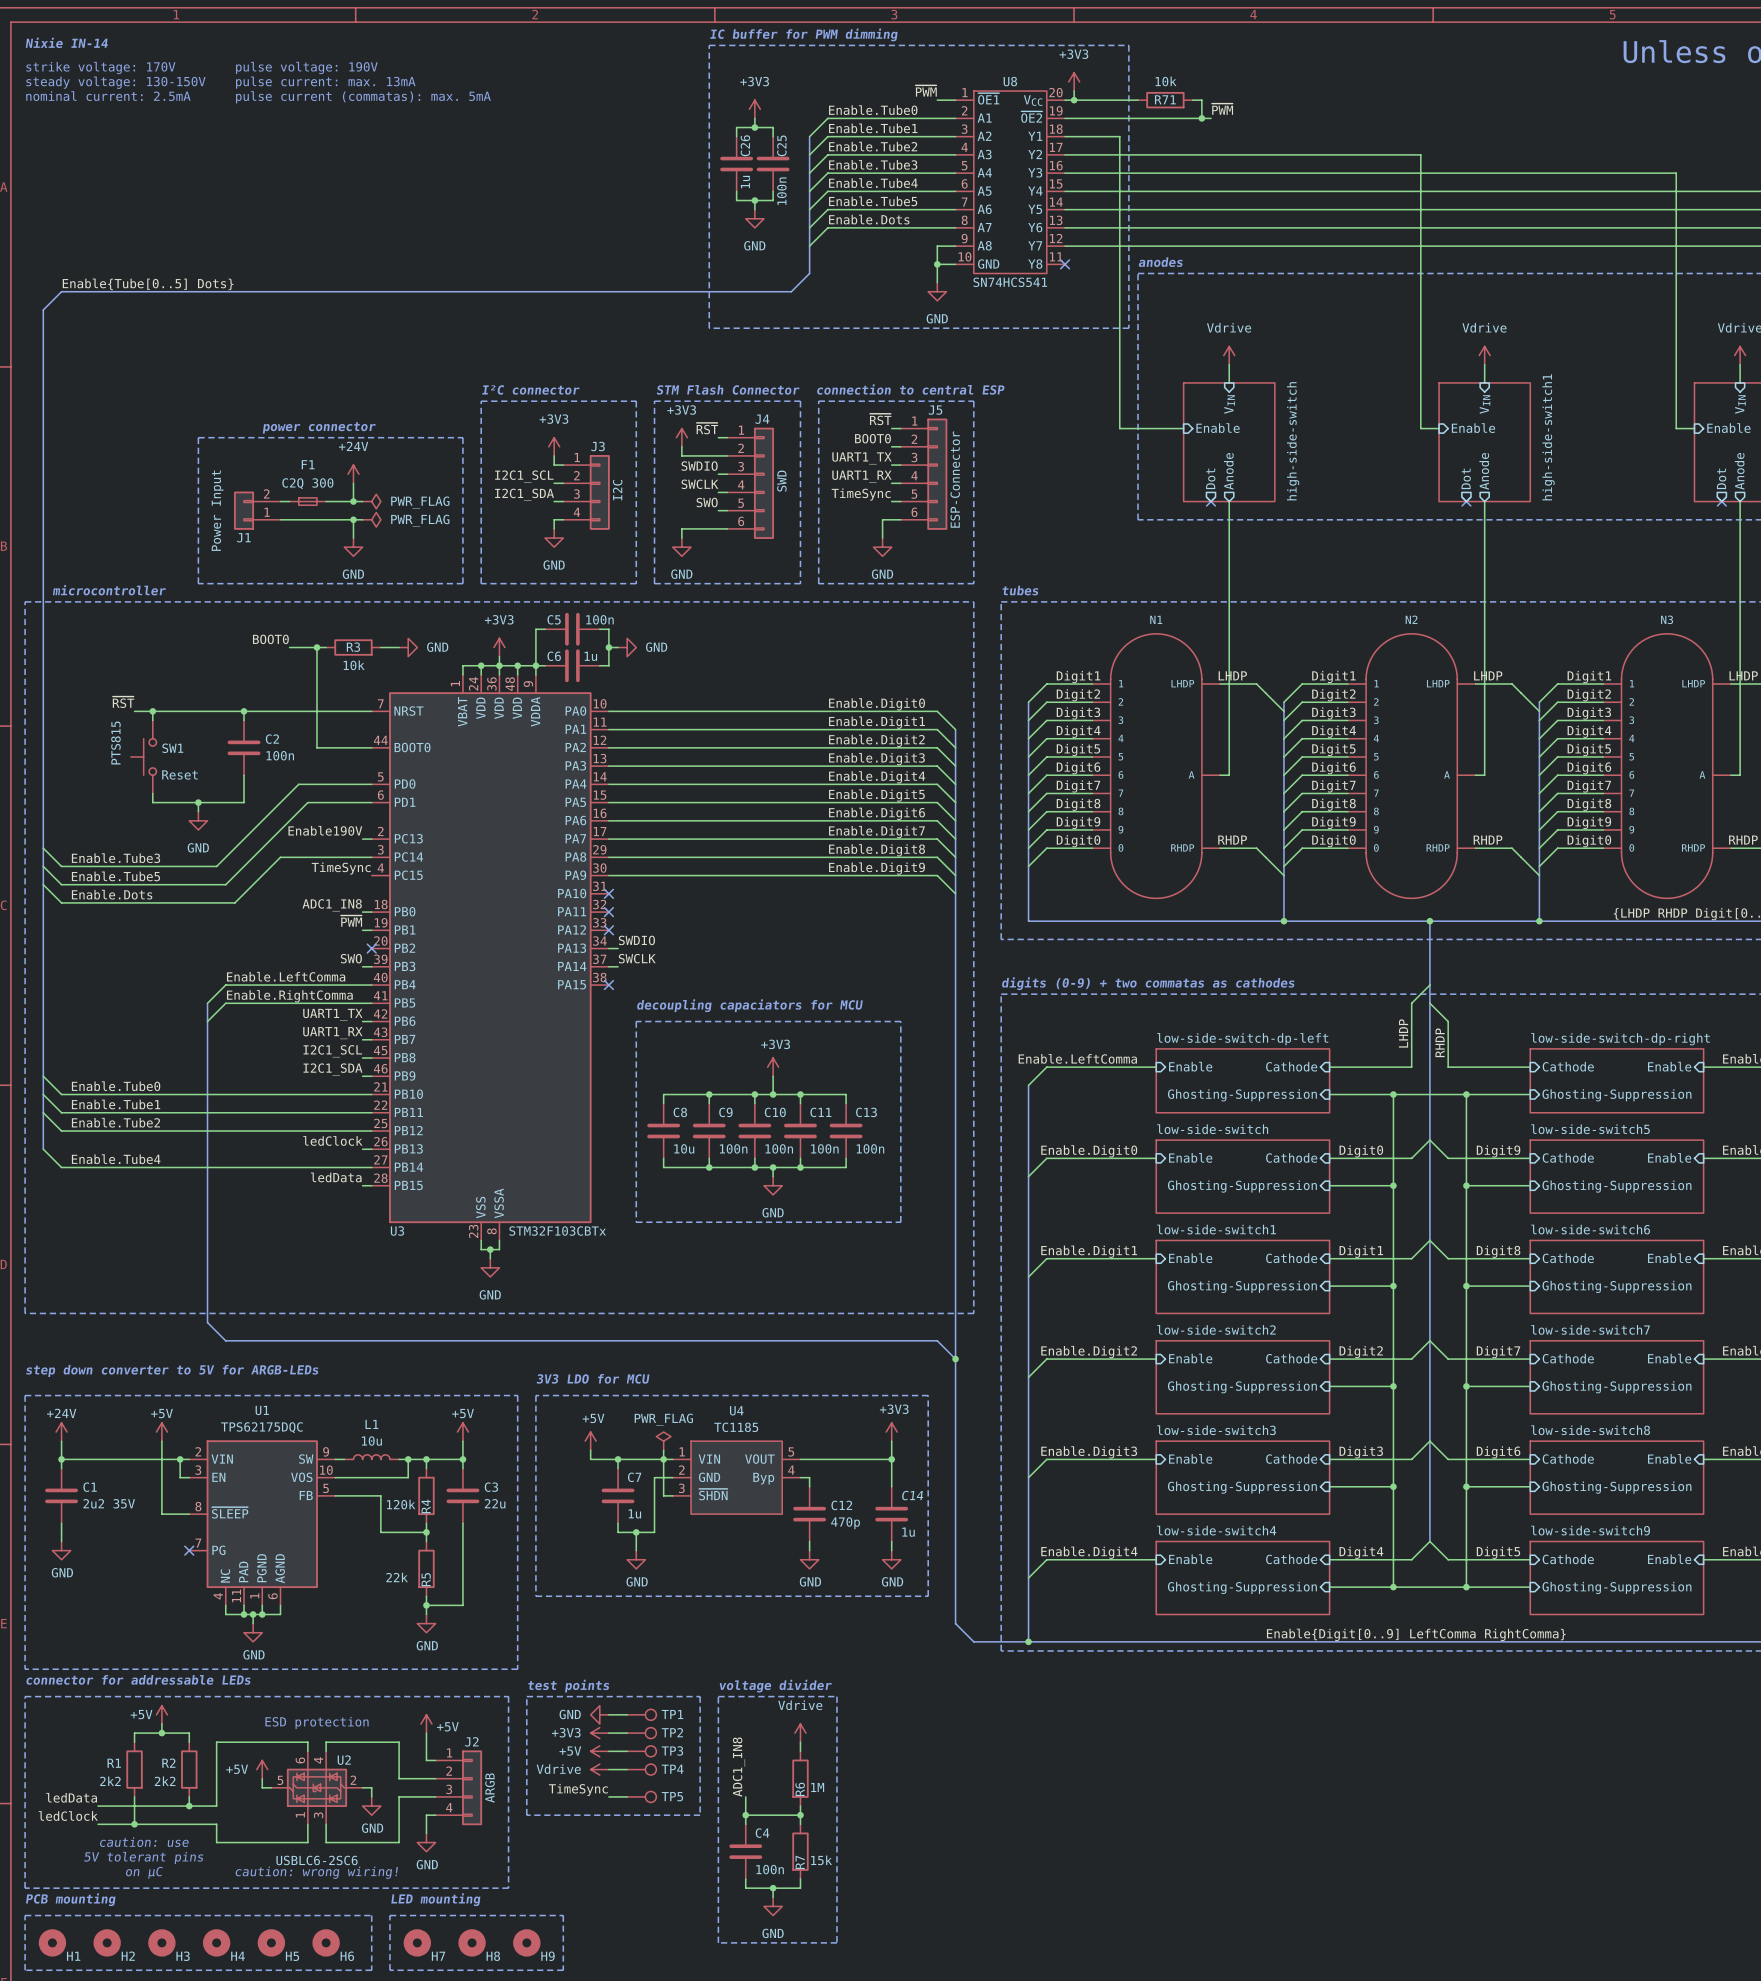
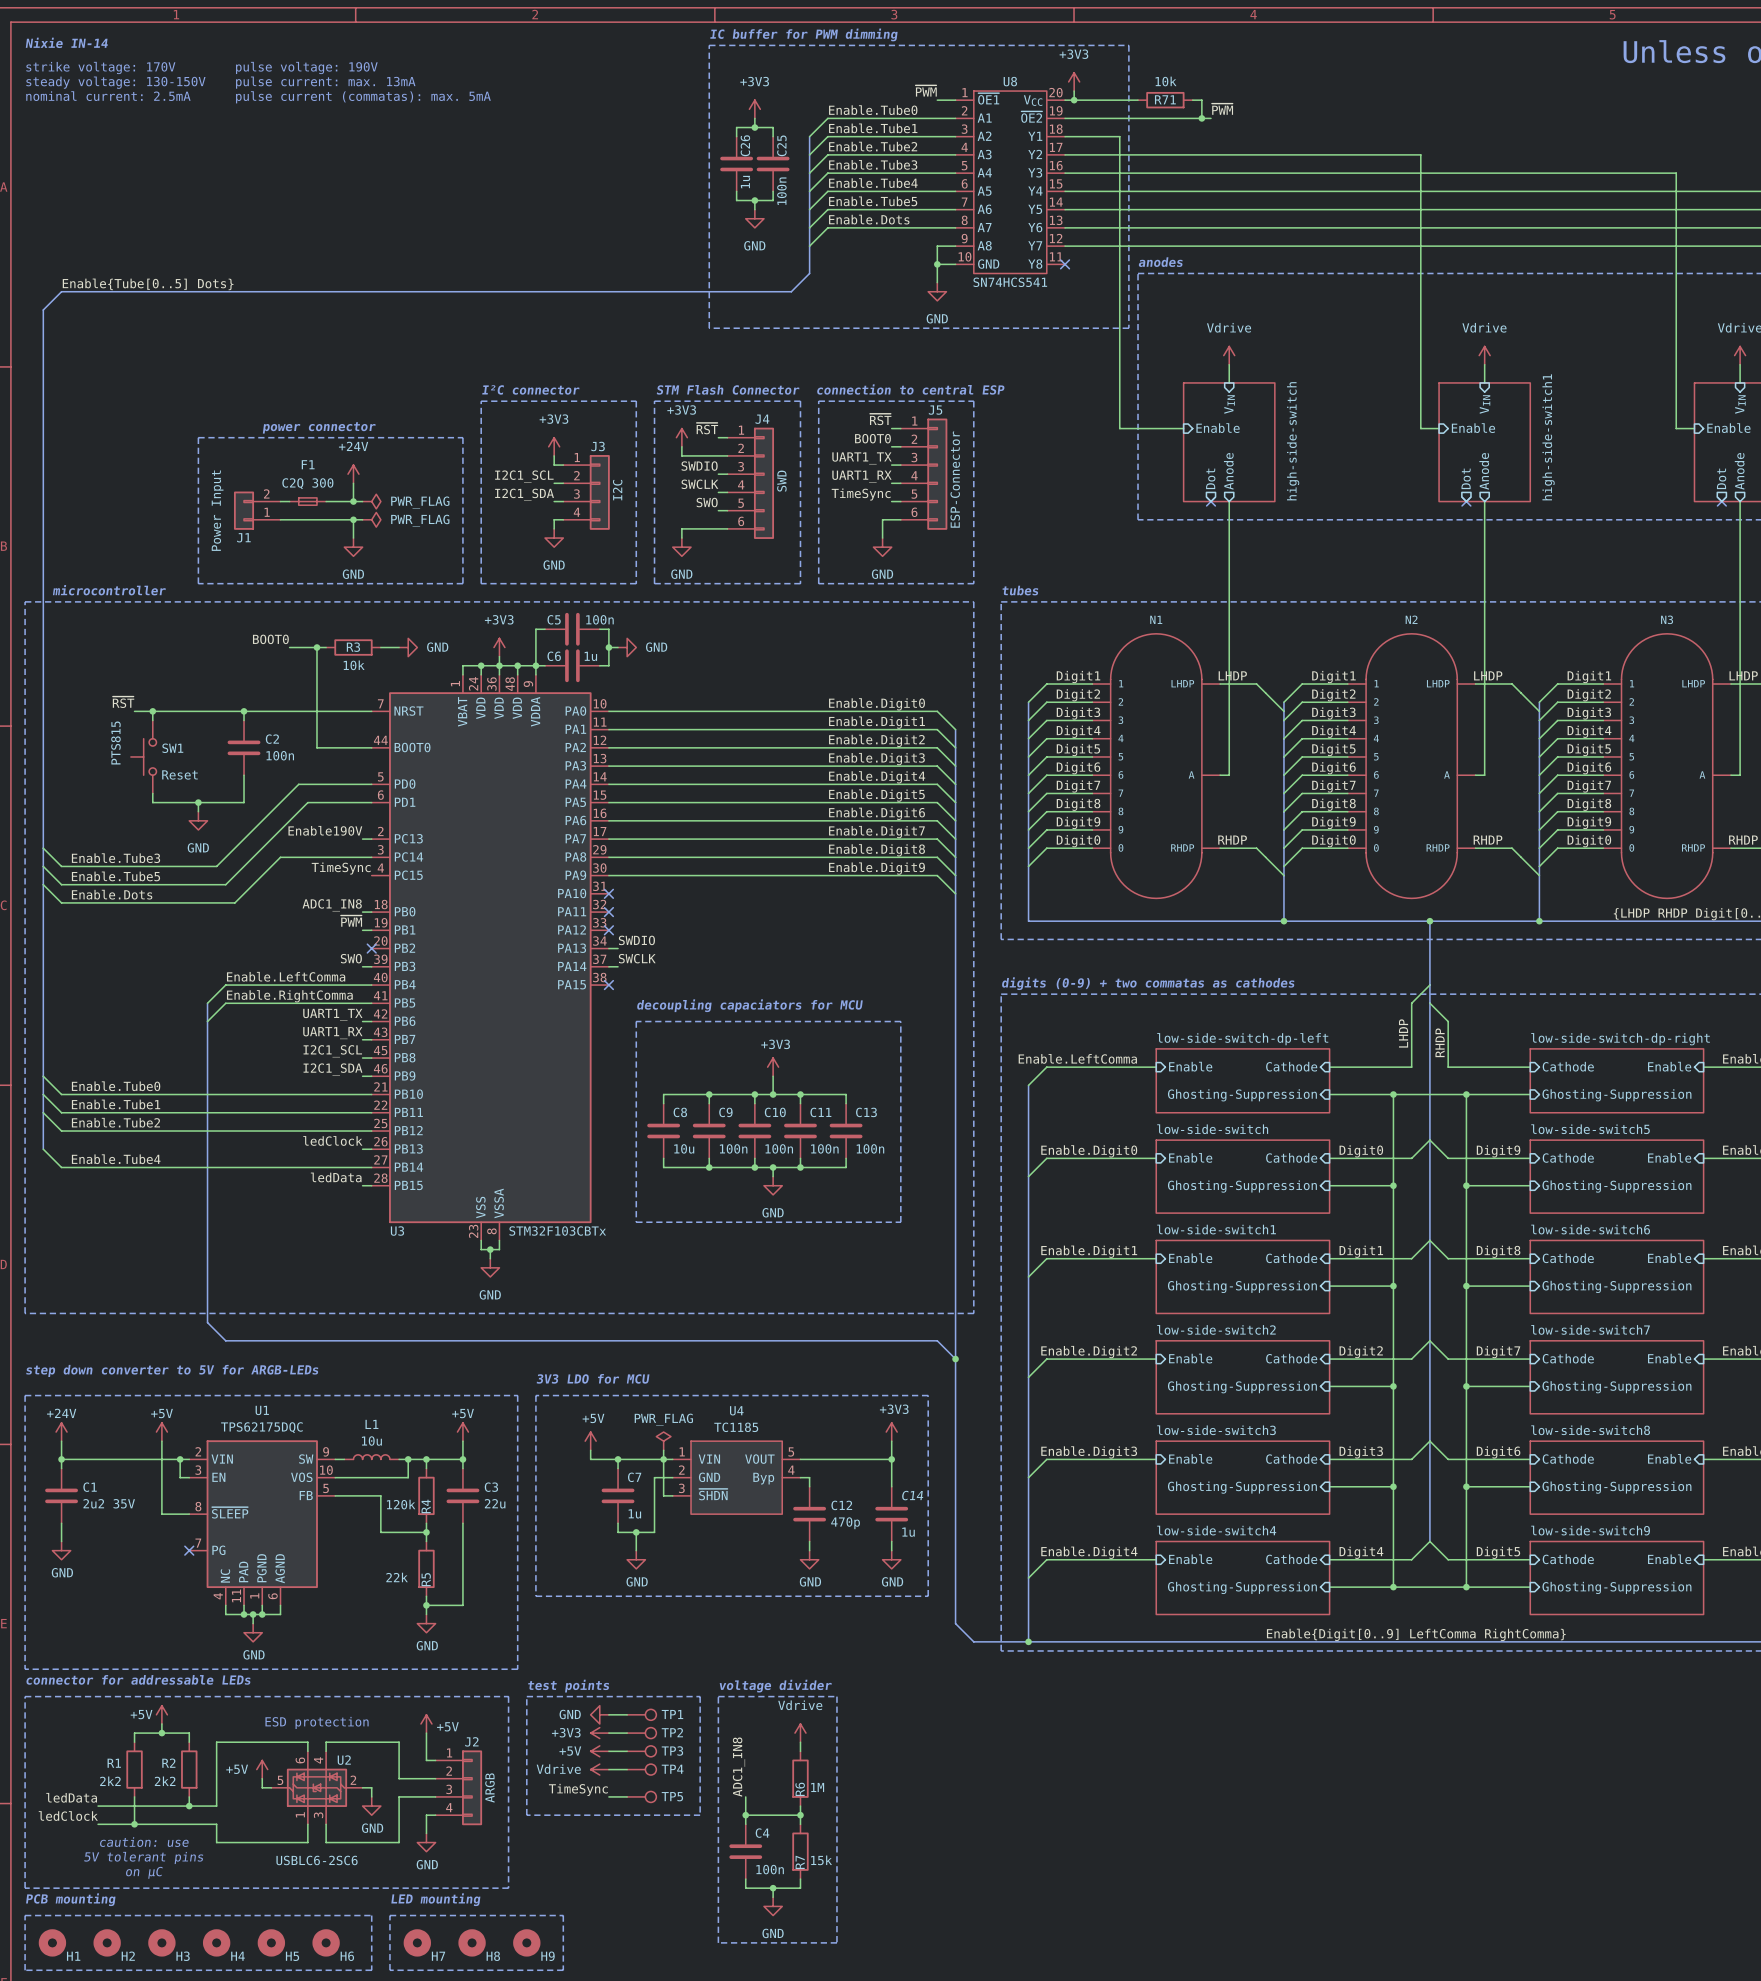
text: caution: wrong wiring! (316, 1872) -> none

